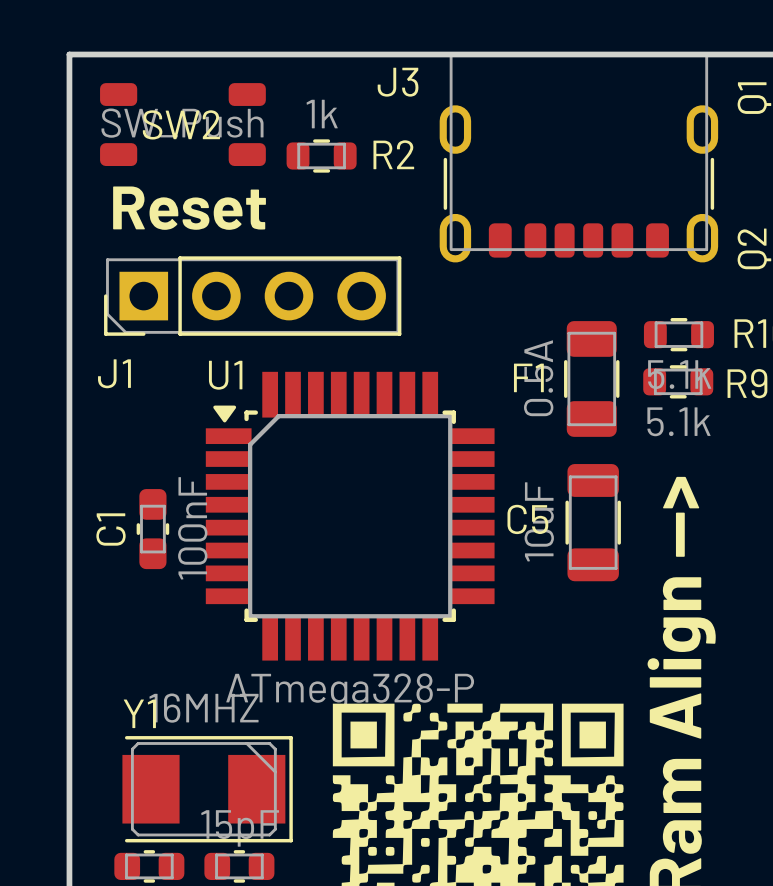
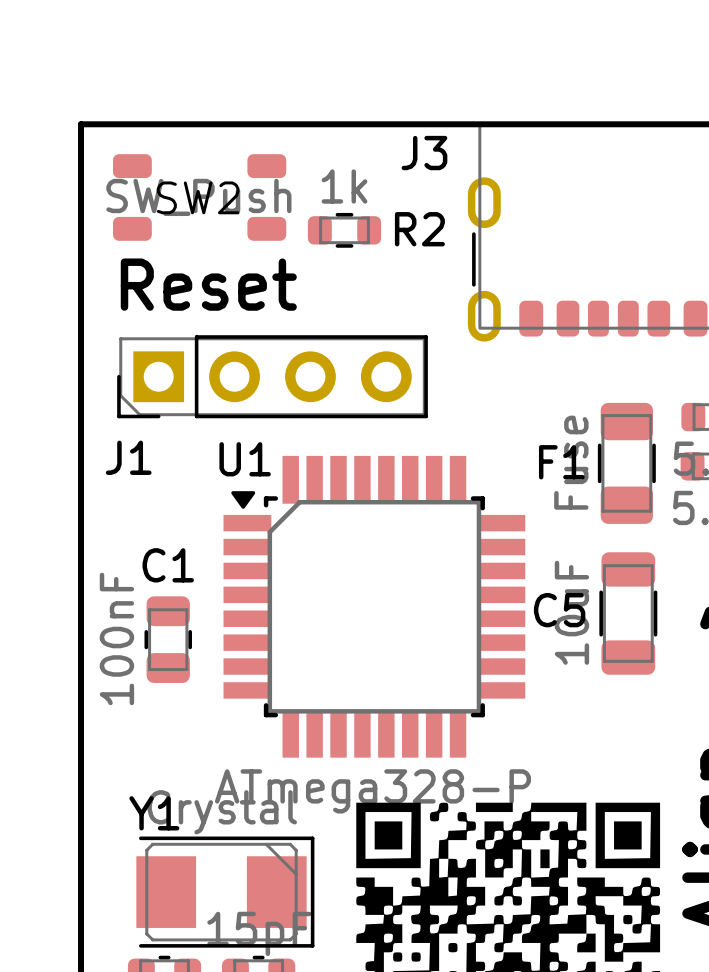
F1 value: 0.5A (538, 378) -> Fuse (571, 462)
C1 footprint: [136, 489, 170, 570] -> [144, 596, 192, 683]
C1 value position: 100nF (192, 528) -> 100nF (116, 638)
C1 name rotation: 0° (111, 529) -> 90° clockwise (168, 565)
Y1 value: 16MHZ (203, 708) -> Crystal (222, 812)

